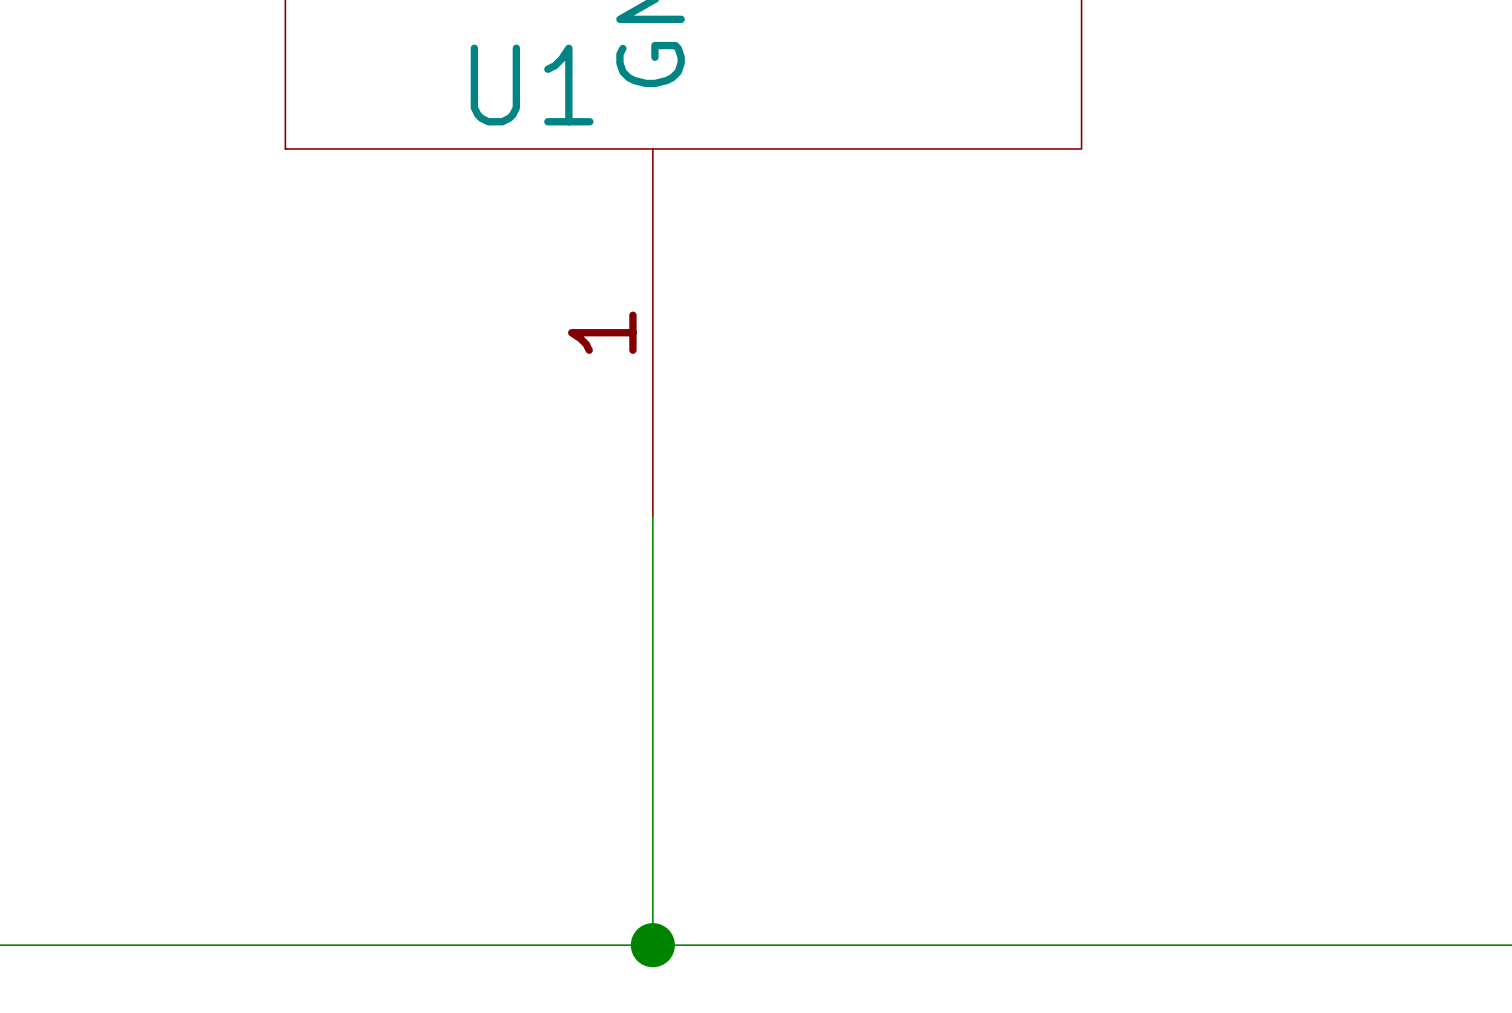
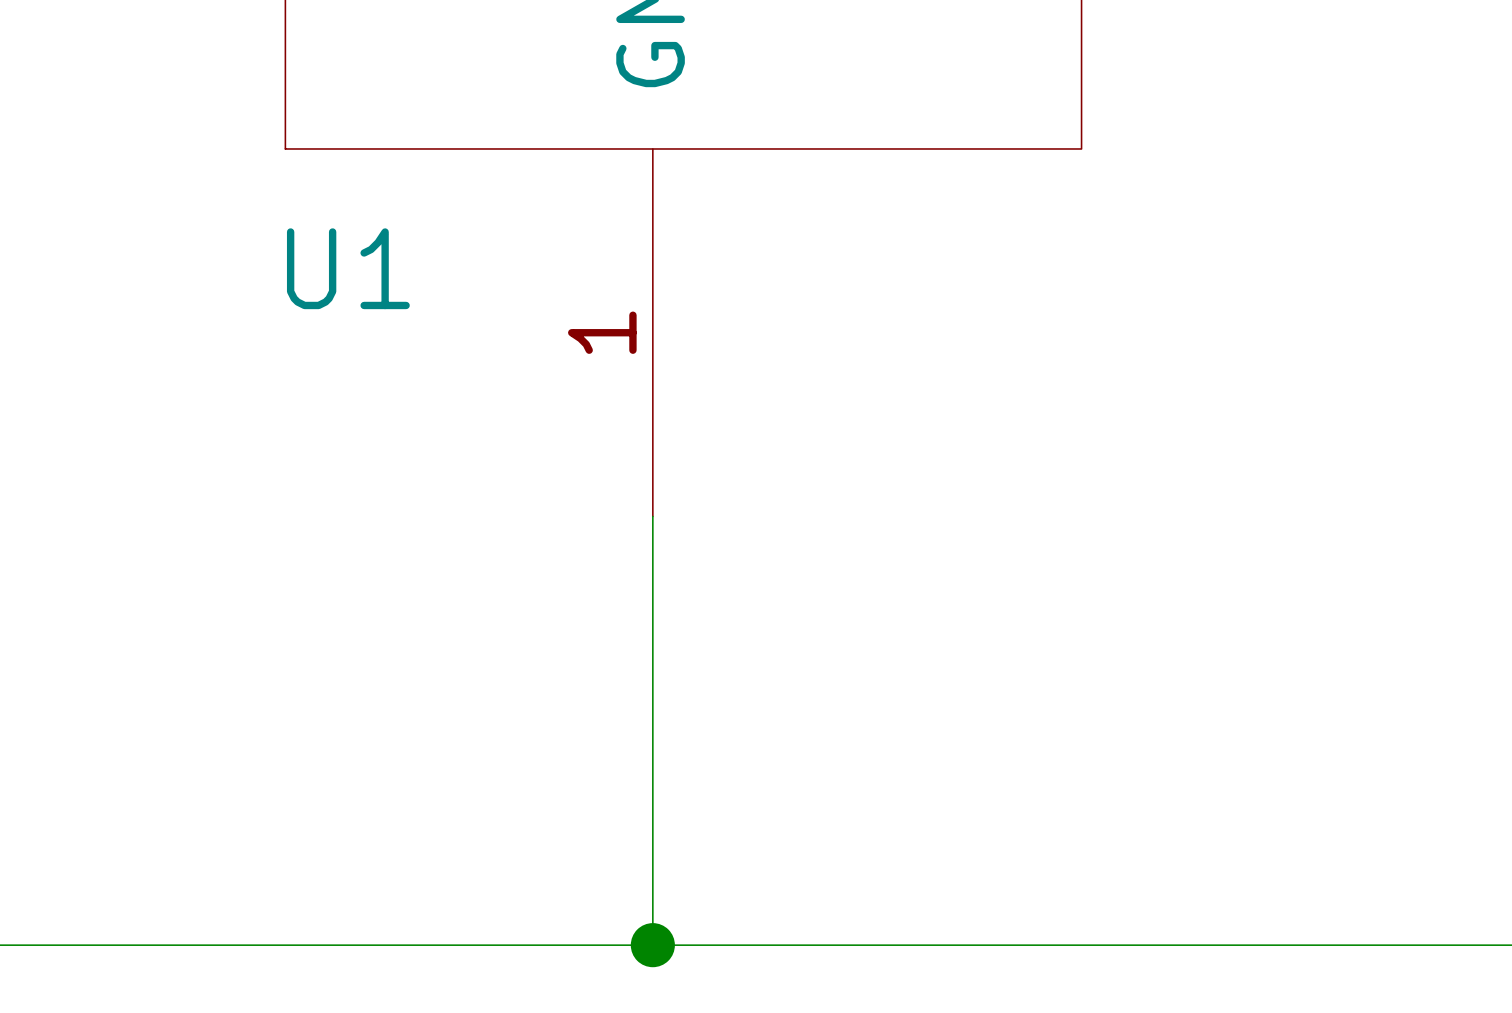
U1 name position: U1 (532, 85) -> U1 (348, 268)

